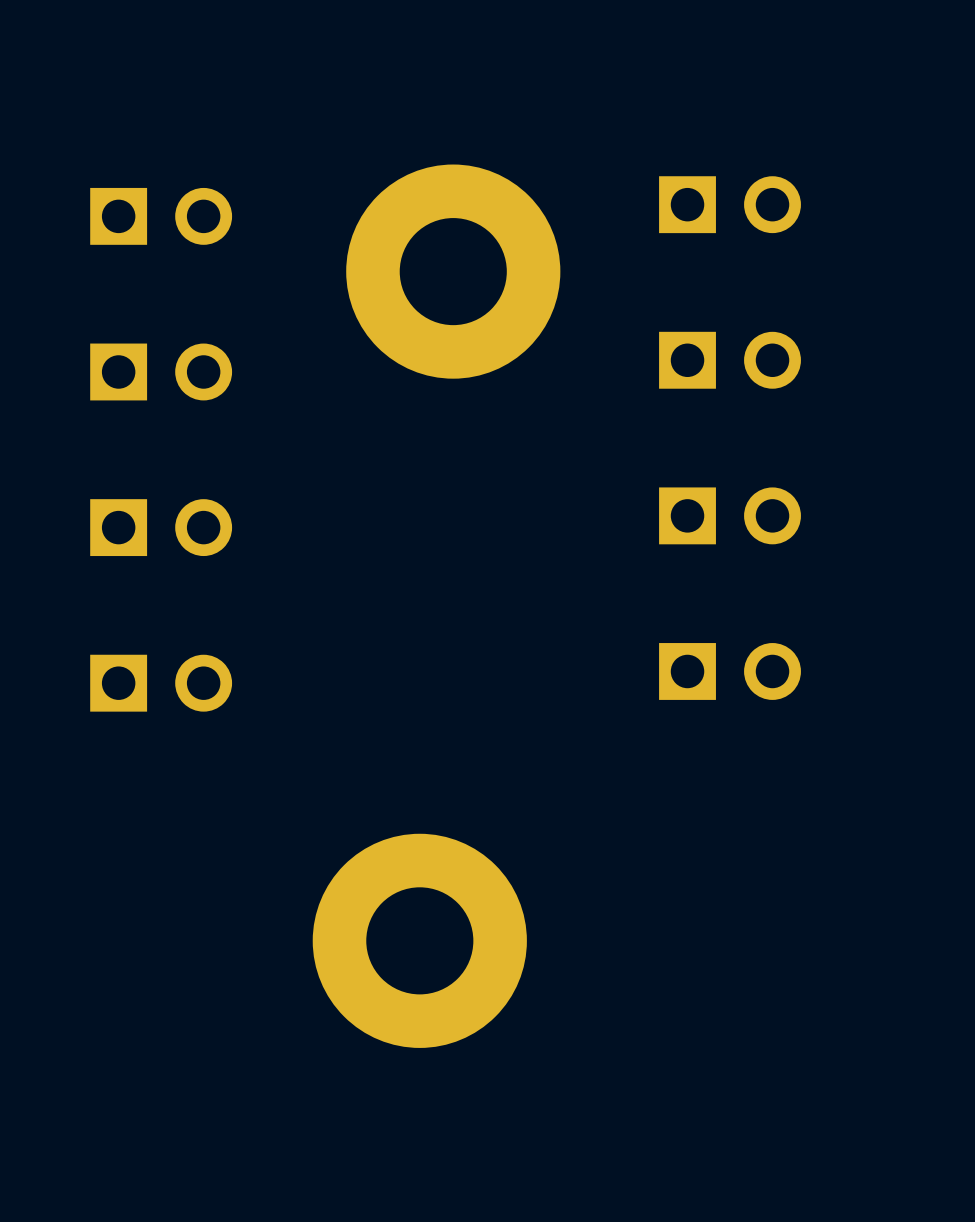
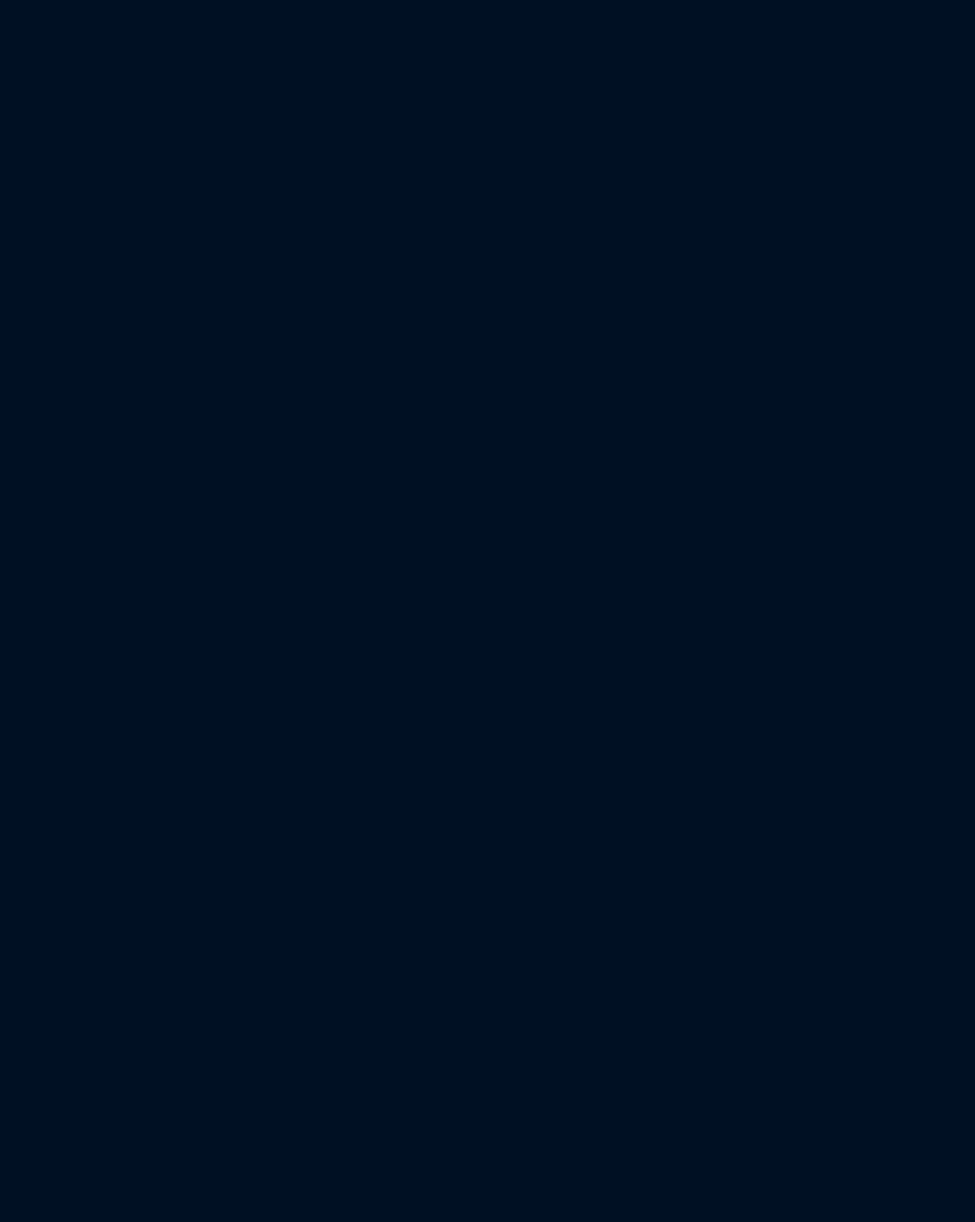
part: (730, 204) -> none
part: (161, 216) -> none
part: (453, 271) -> none
part: (730, 360) -> none
part: (161, 371) -> none
part: (730, 515) -> none
part: (161, 527) -> none
part: (730, 671) -> none
part: (161, 683) -> none
part: (419, 940) -> none

